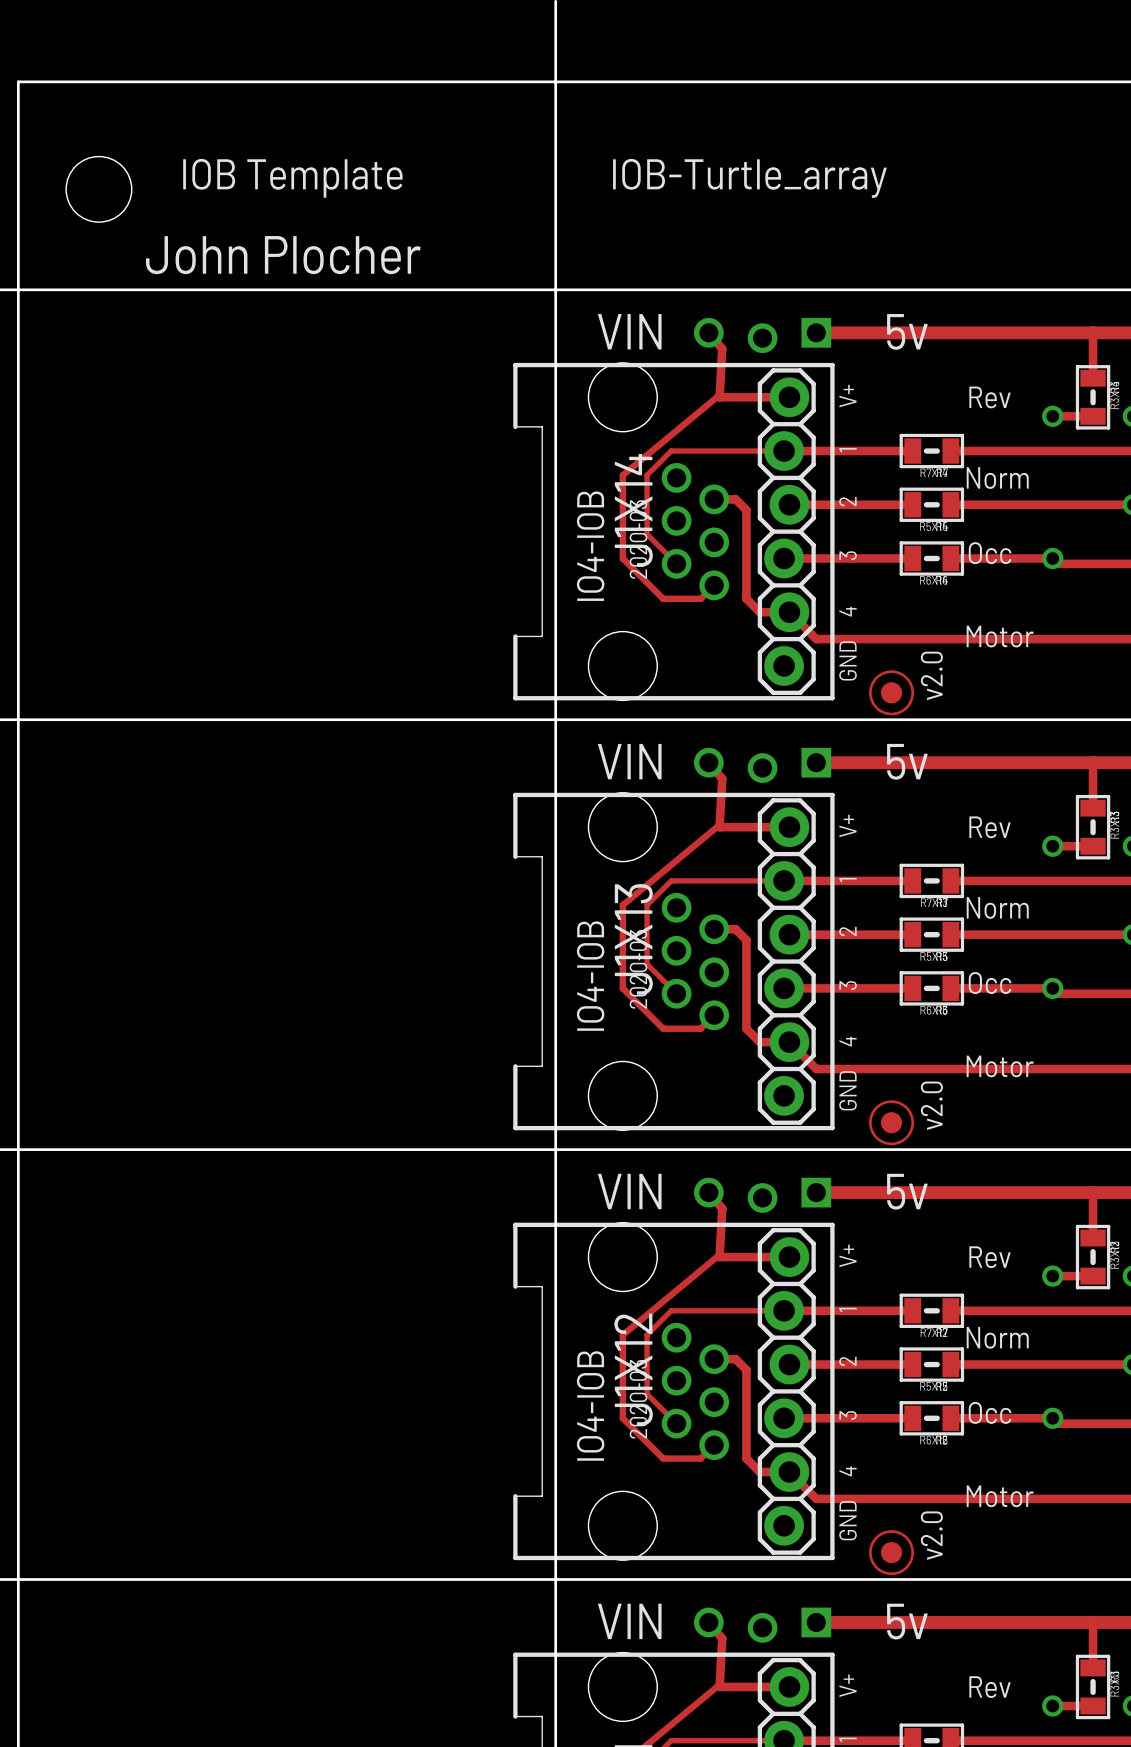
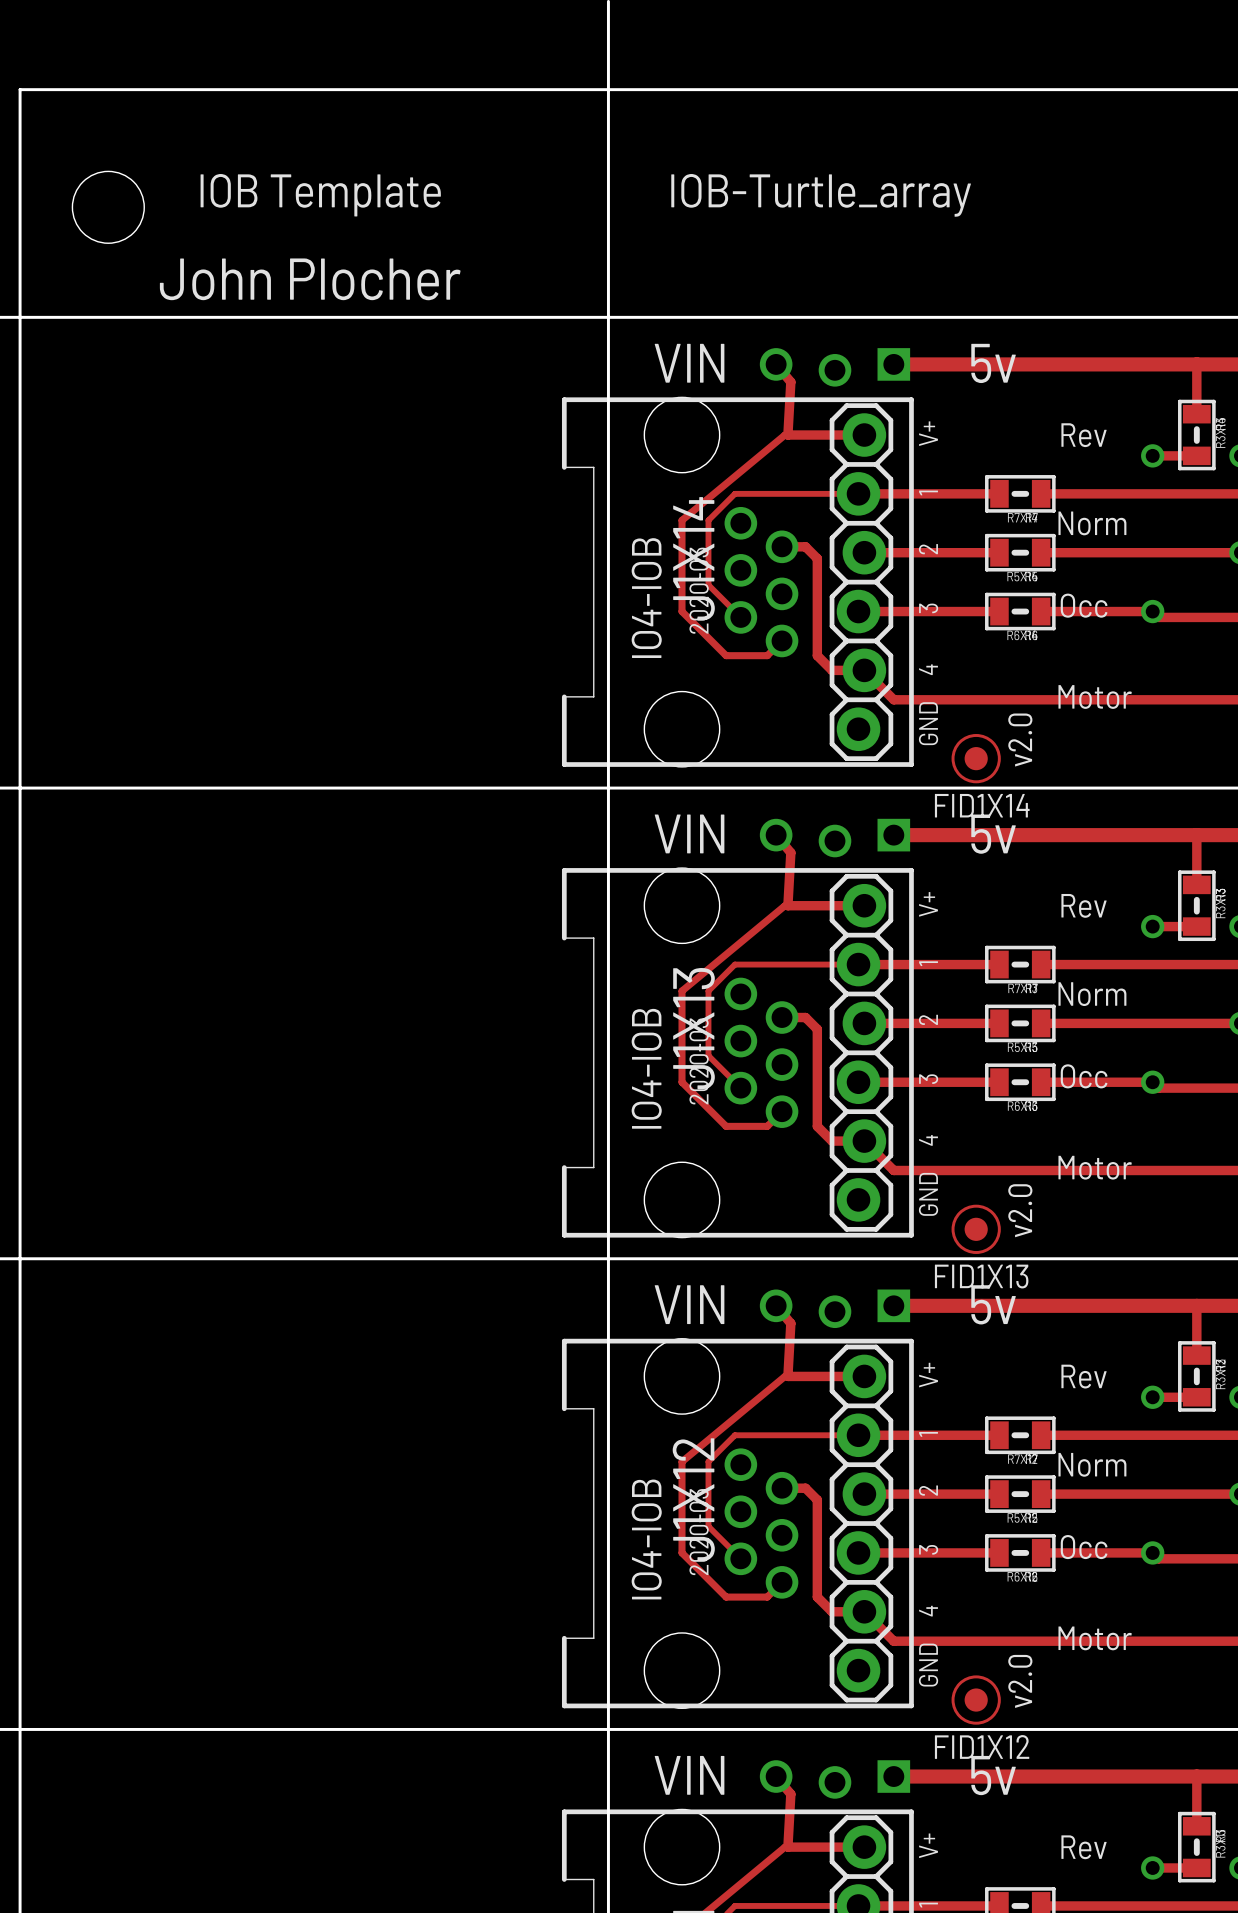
FID1X14 name: none -> FID1X14 (982, 805)
FID1X13 name: none -> FID1X13 (981, 1276)
FID1X12 name: none -> FID1X12 (982, 1746)

